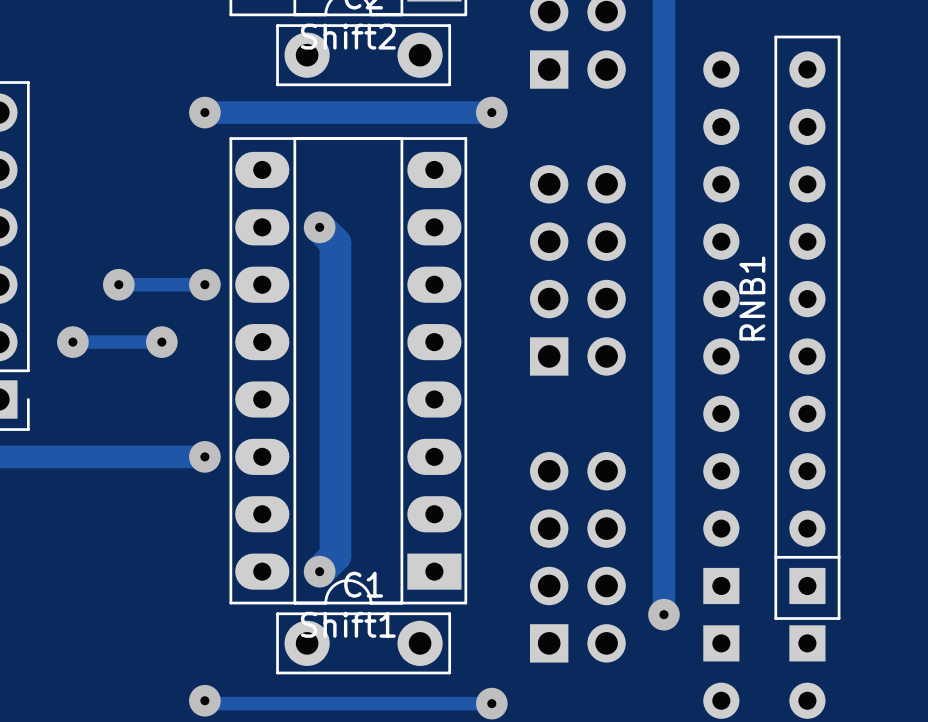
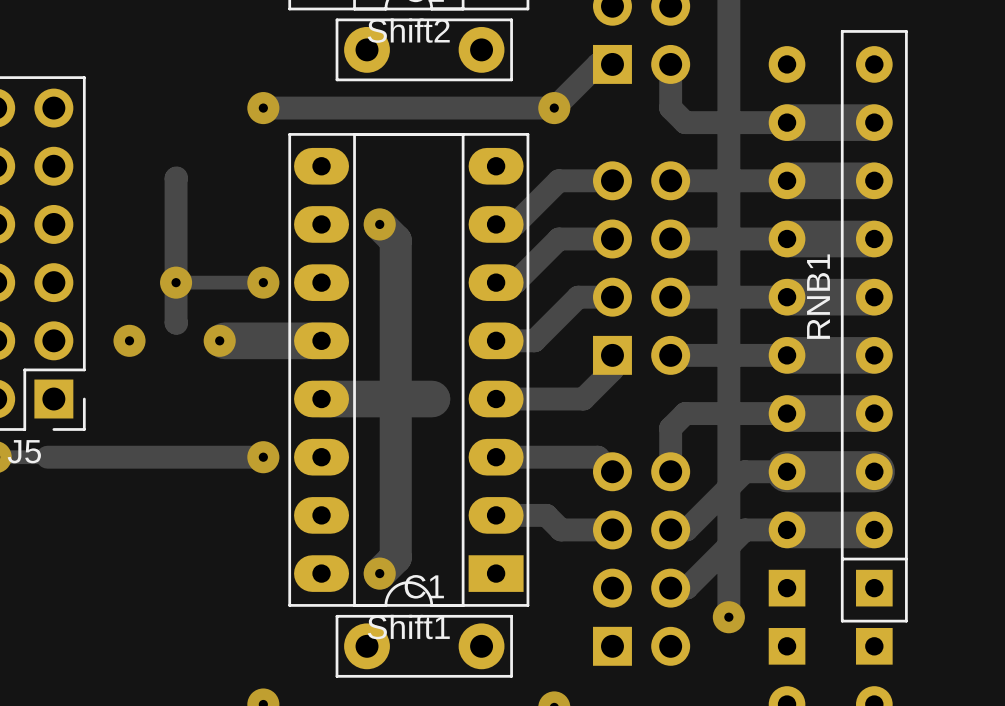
track: none -> (612, 64) (597, 64) (554, 108)
track: none -> (670, 64) (670, 108) (685, 122) (874, 122)
track: none -> (176, 177) (176, 323)
track: none -> (612, 180) (558, 180) (515, 224) (496, 224)
track: none -> (670, 180) (874, 180)
track: none -> (612, 239) (558, 239) (515, 282) (496, 282)
track: none -> (670, 239) (874, 239)
track: none -> (612, 297) (578, 297) (534, 340) (496, 340)
track: none -> (670, 297) (874, 297)
track: (72, 342) (161, 342) -> (224, 340) (321, 340) (219, 340)
track: none -> (612, 355) (612, 369) (583, 399) (496, 399)
track: none -> (670, 355) (874, 355)
track: none -> (321, 399) (434, 399)
track: none -> (874, 413) (685, 413) (670, 428) (670, 471)
track: none -> (496, 457) (597, 457) (612, 471)
track: none -> (874, 471) (744, 471) (686, 529) (670, 529)
track: none -> (496, 515) (546, 515) (561, 529) (612, 529)
track: none -> (874, 529) (744, 529) (686, 588) (670, 588) (678, 588)

